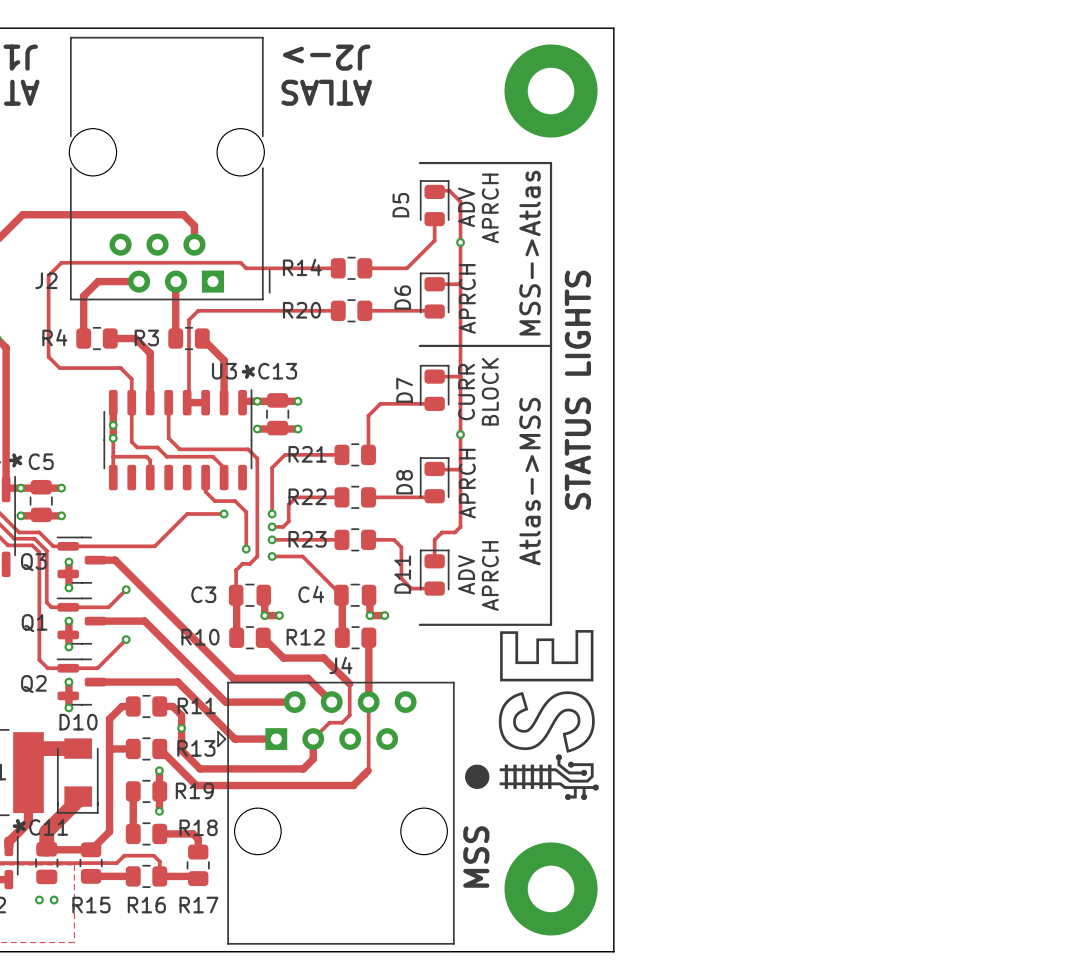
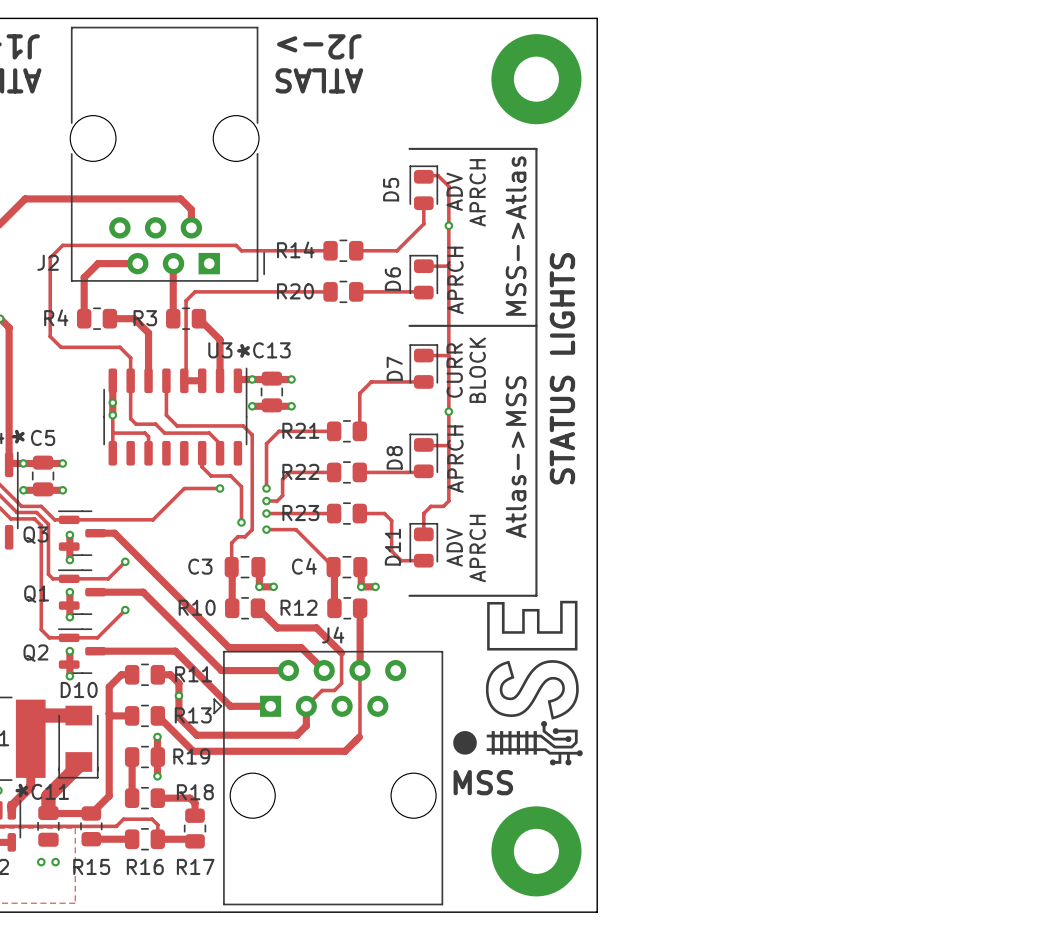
text rotation: 0° (476, 857) -> 90° clockwise (483, 782)

